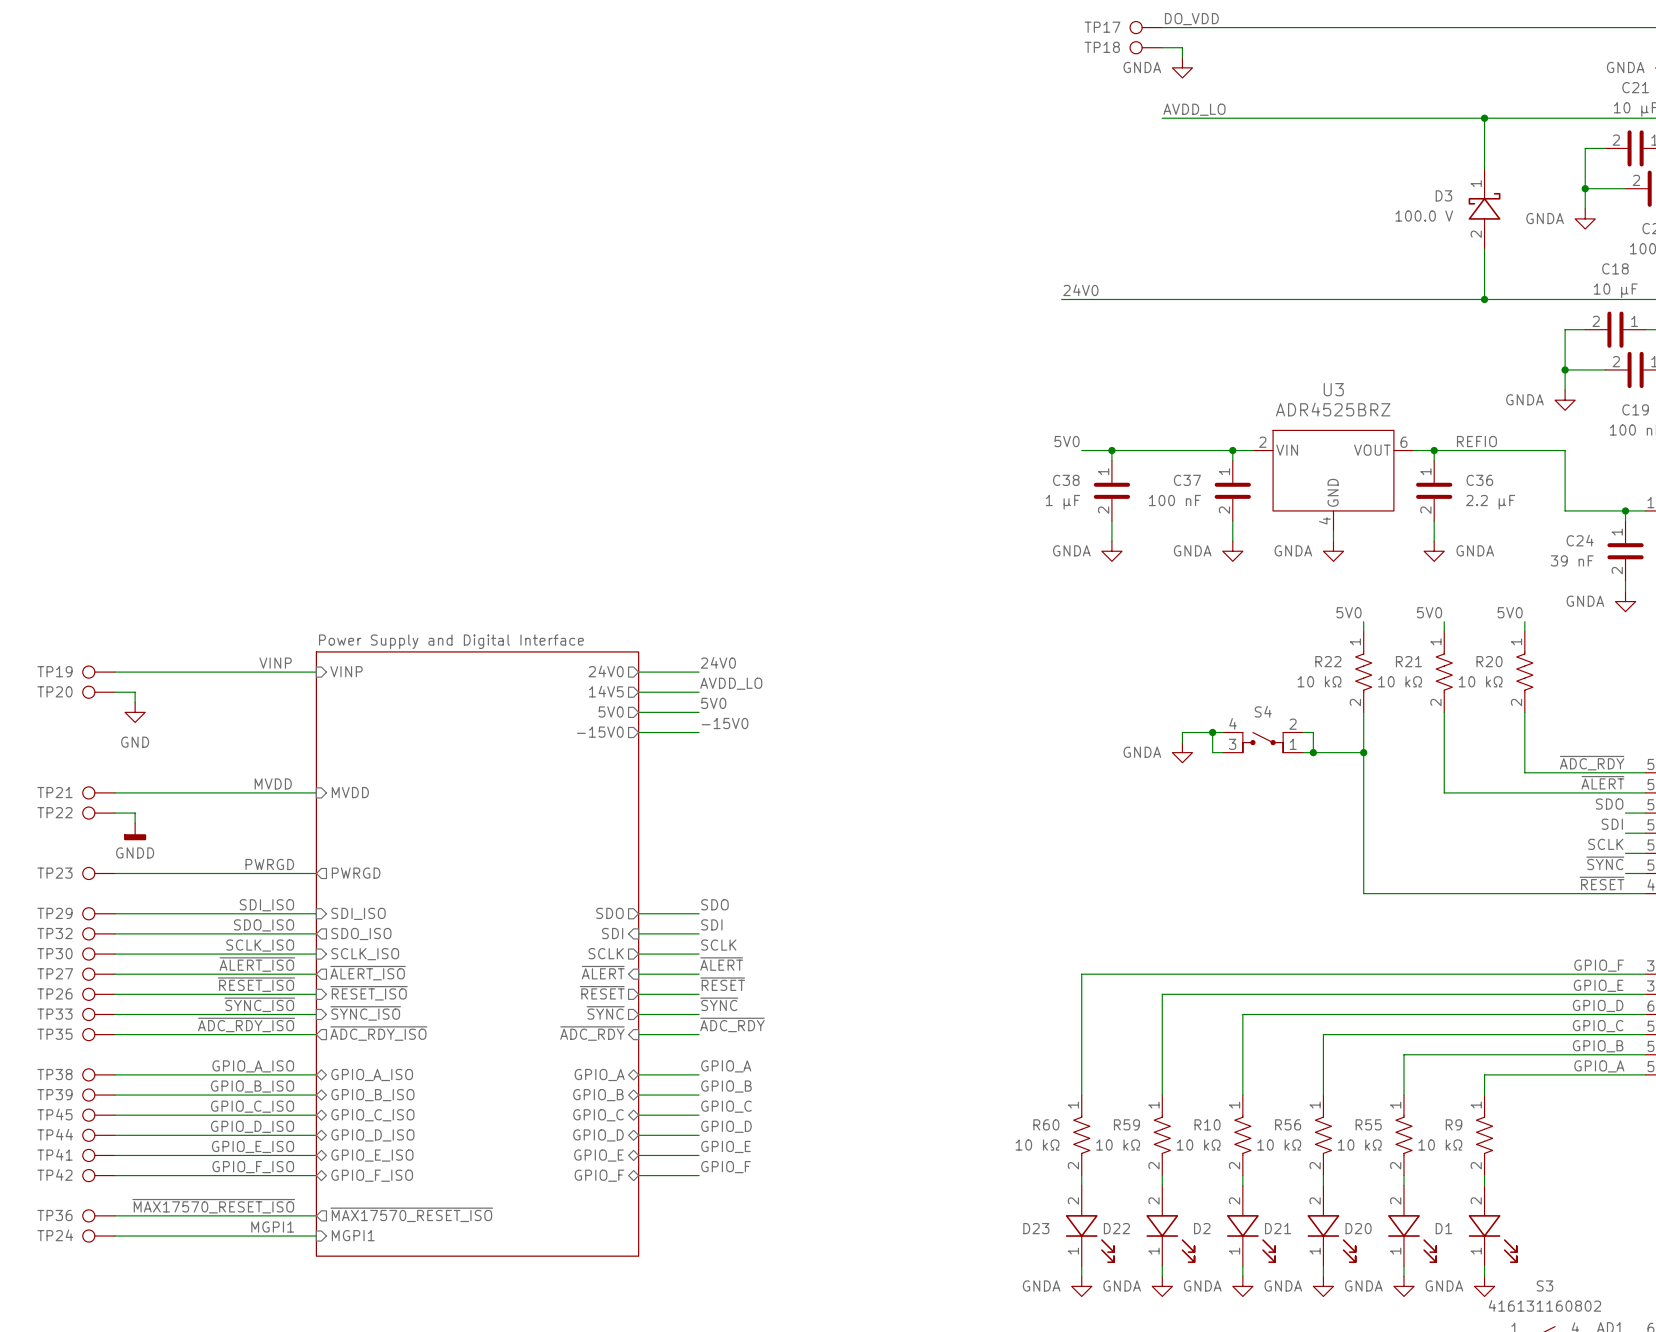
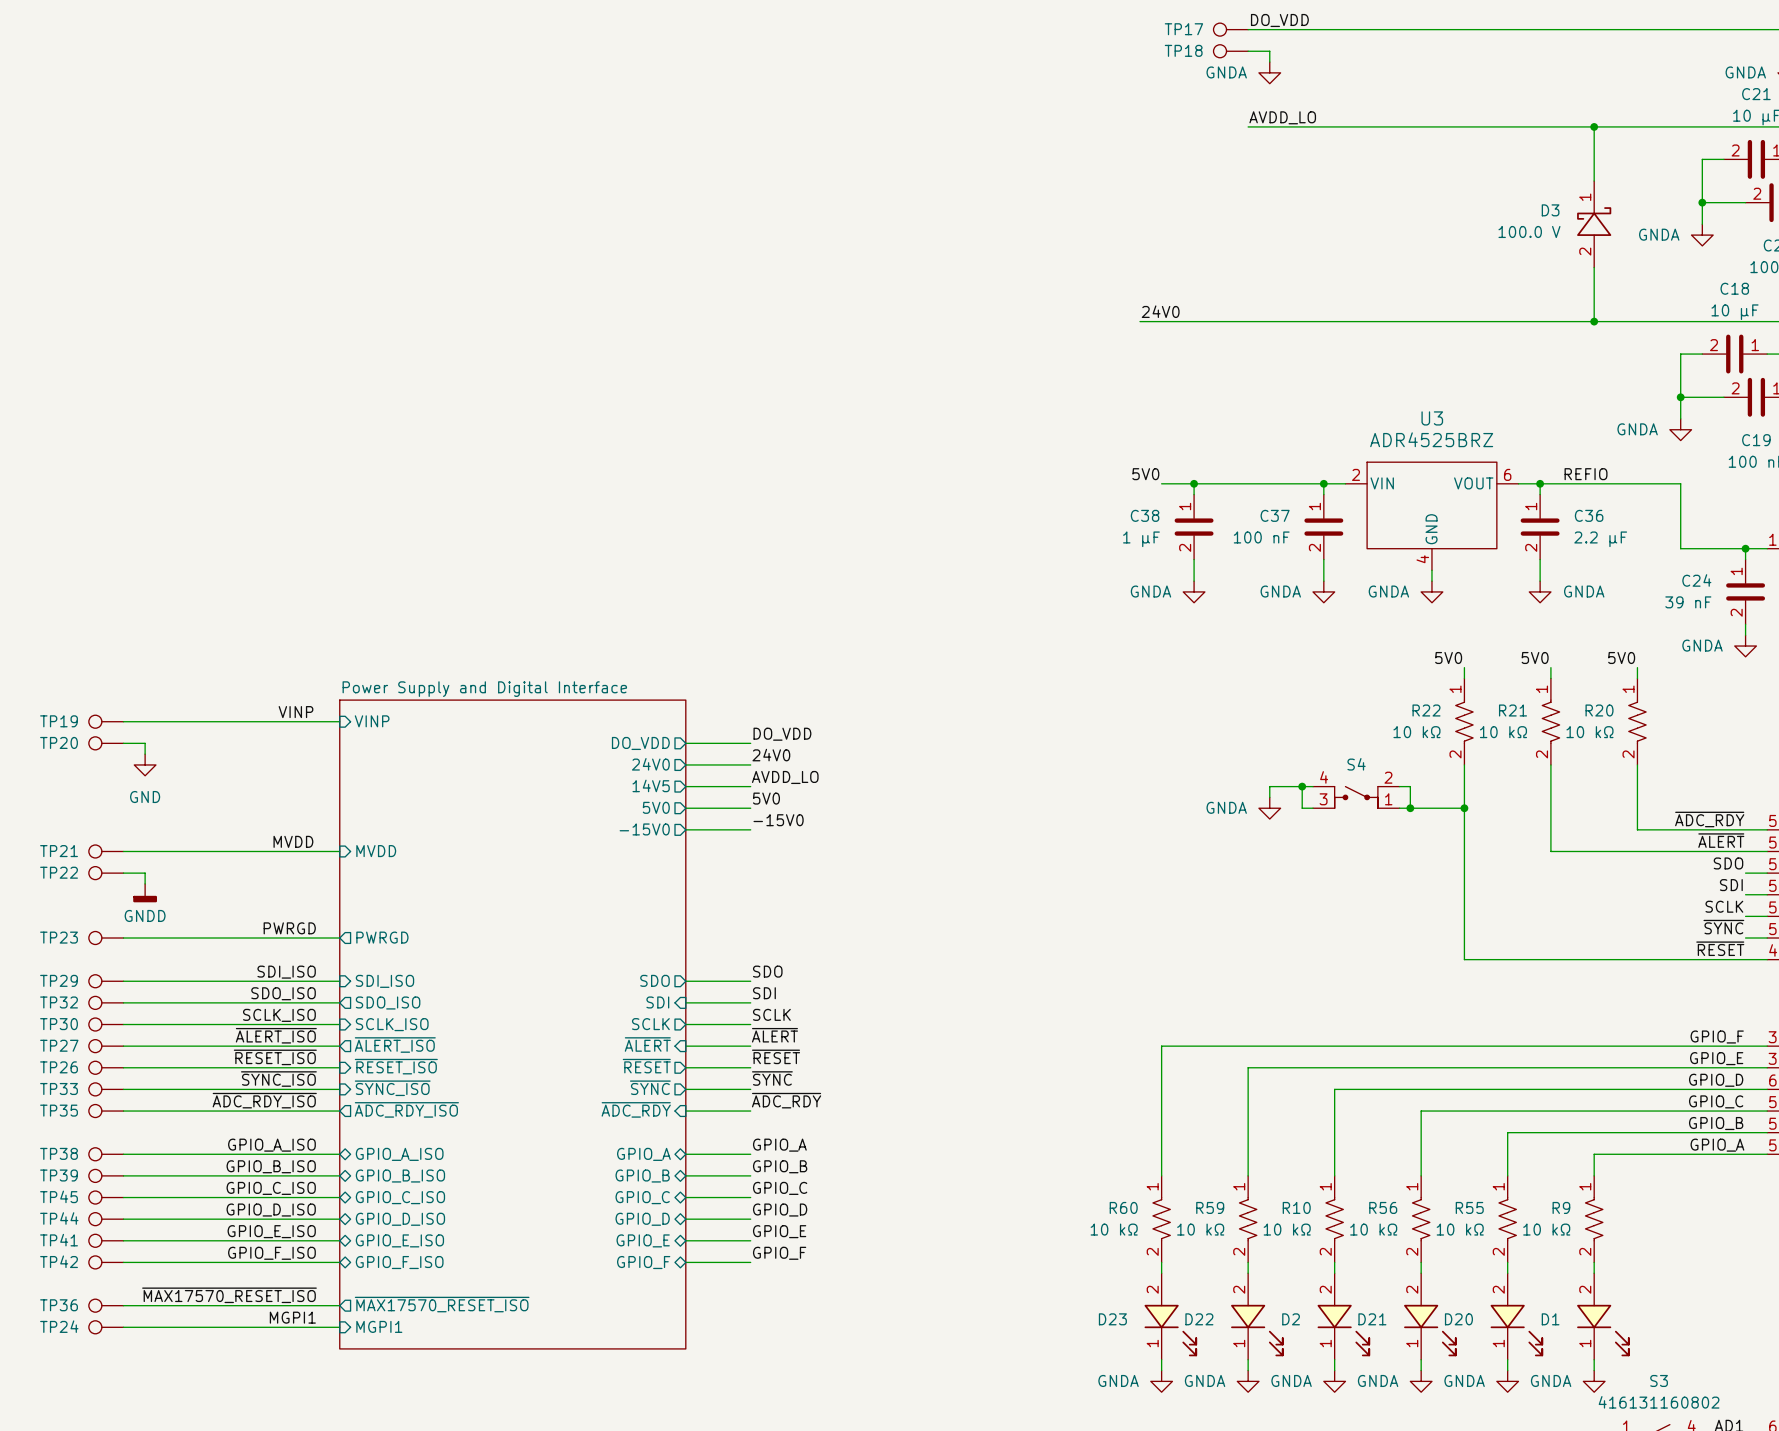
label: 24V0 (718, 662) -> none
sheet pin: 24V0 (606, 671) -> none
wire: (638, 672) (699, 672) -> (685, 808) (750, 808)
label: AVDD_LO (731, 683) -> DO_VDD (782, 734)
sheet pin: 14V5 (606, 691) -> DO_VDD (640, 743)
label: 5V0 (713, 703) -> 24V0 (771, 755)
sheet pin: 5V0 (611, 711) -> 24V0 (650, 764)
label: -15V0 (725, 723) -> AVDD_LO (785, 777)
sheet pin: -15V0 (600, 732) -> 14V5 (651, 785)
label: none -> 5V0 (766, 798)
sheet pin: none -> 5V0 (656, 807)
label: none -> -15V0 (778, 820)
sheet pin: none -> -15V0 (644, 829)
wire: none -> (685, 829) (750, 829)

